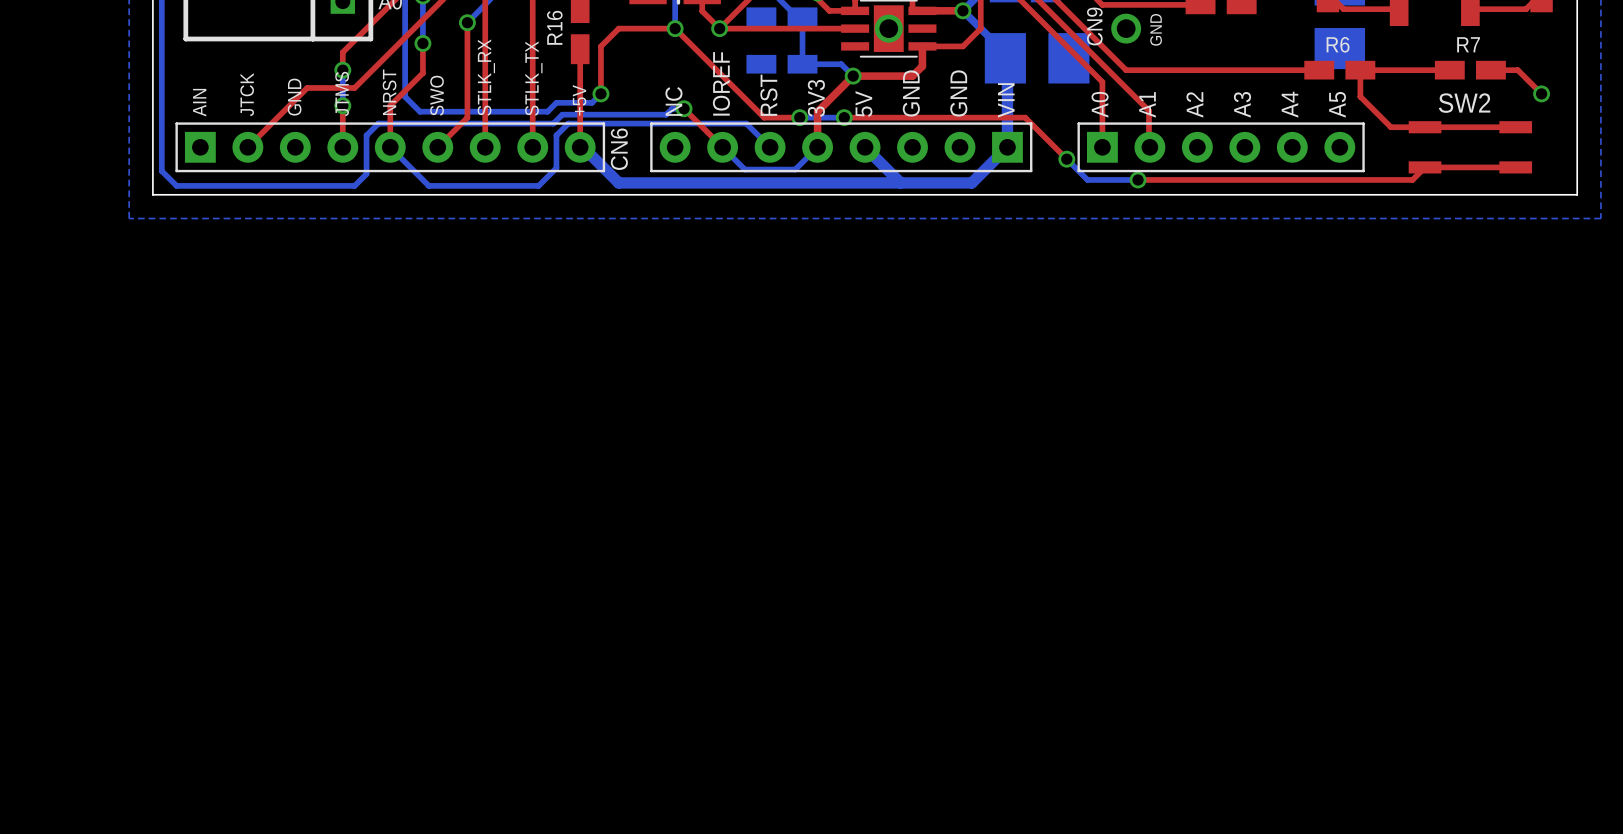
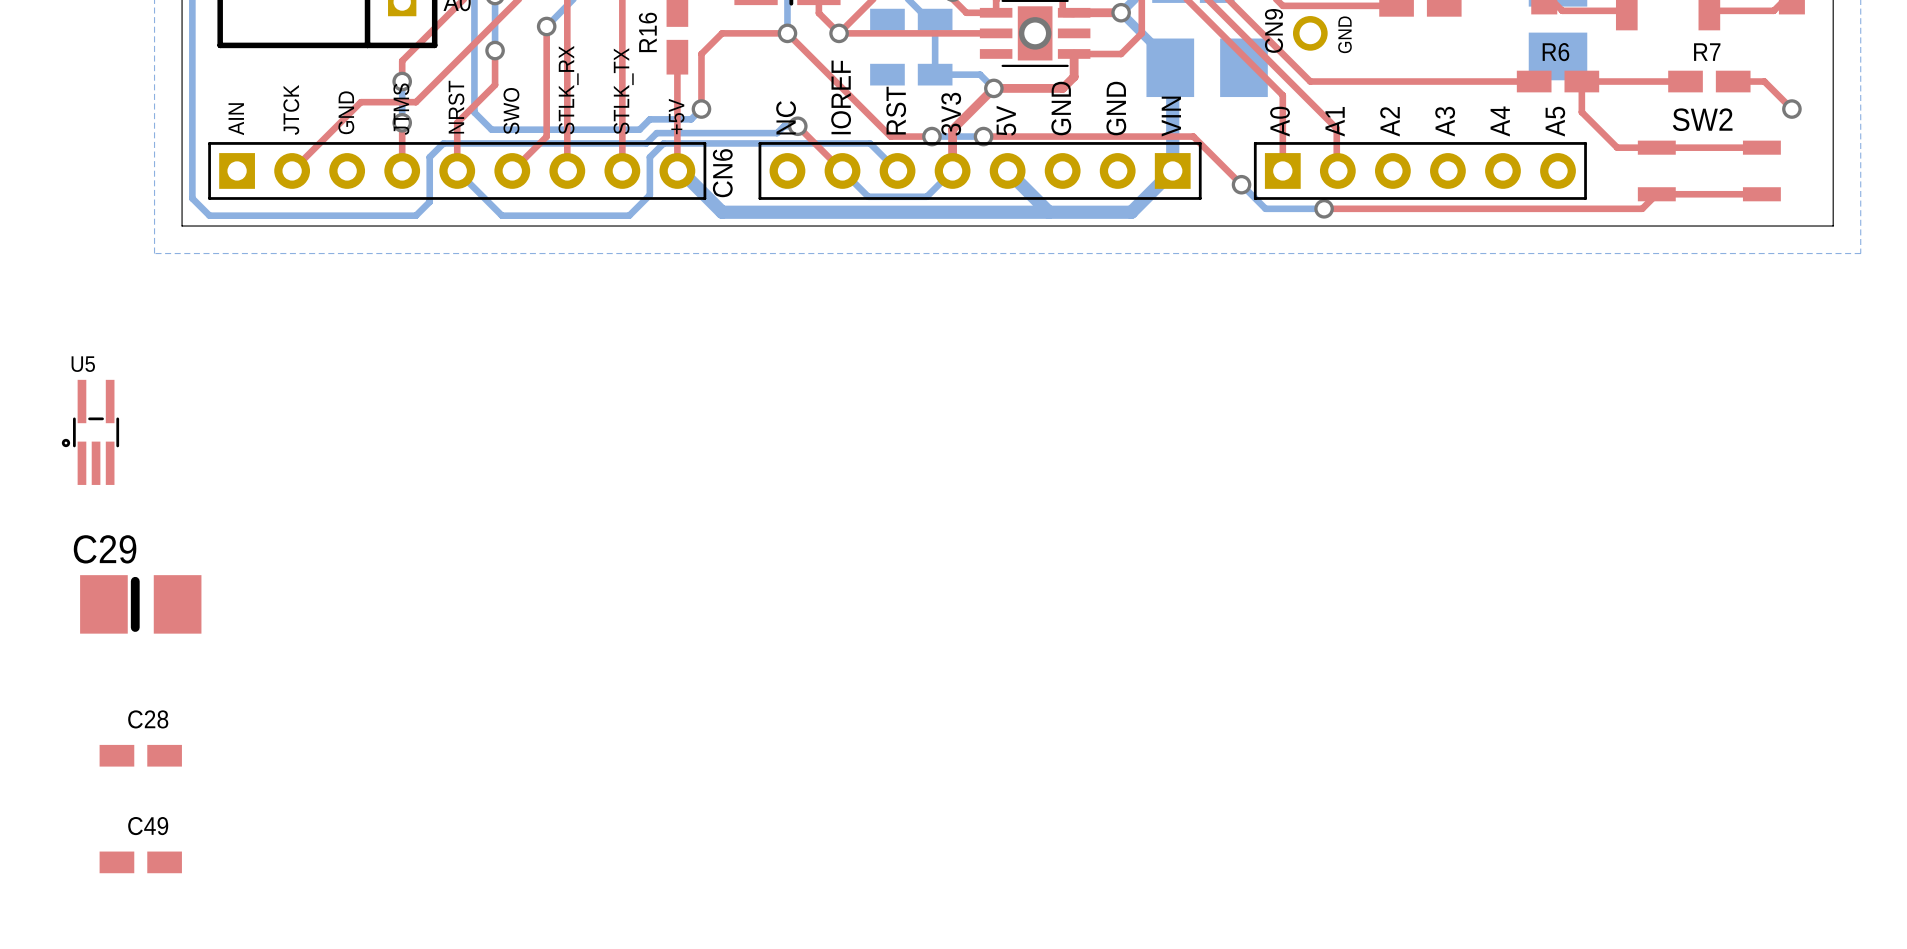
U5: none -> (90, 432)
C29: none -> (140, 604)
C28: none -> (140, 755)
C49: none -> (140, 862)

